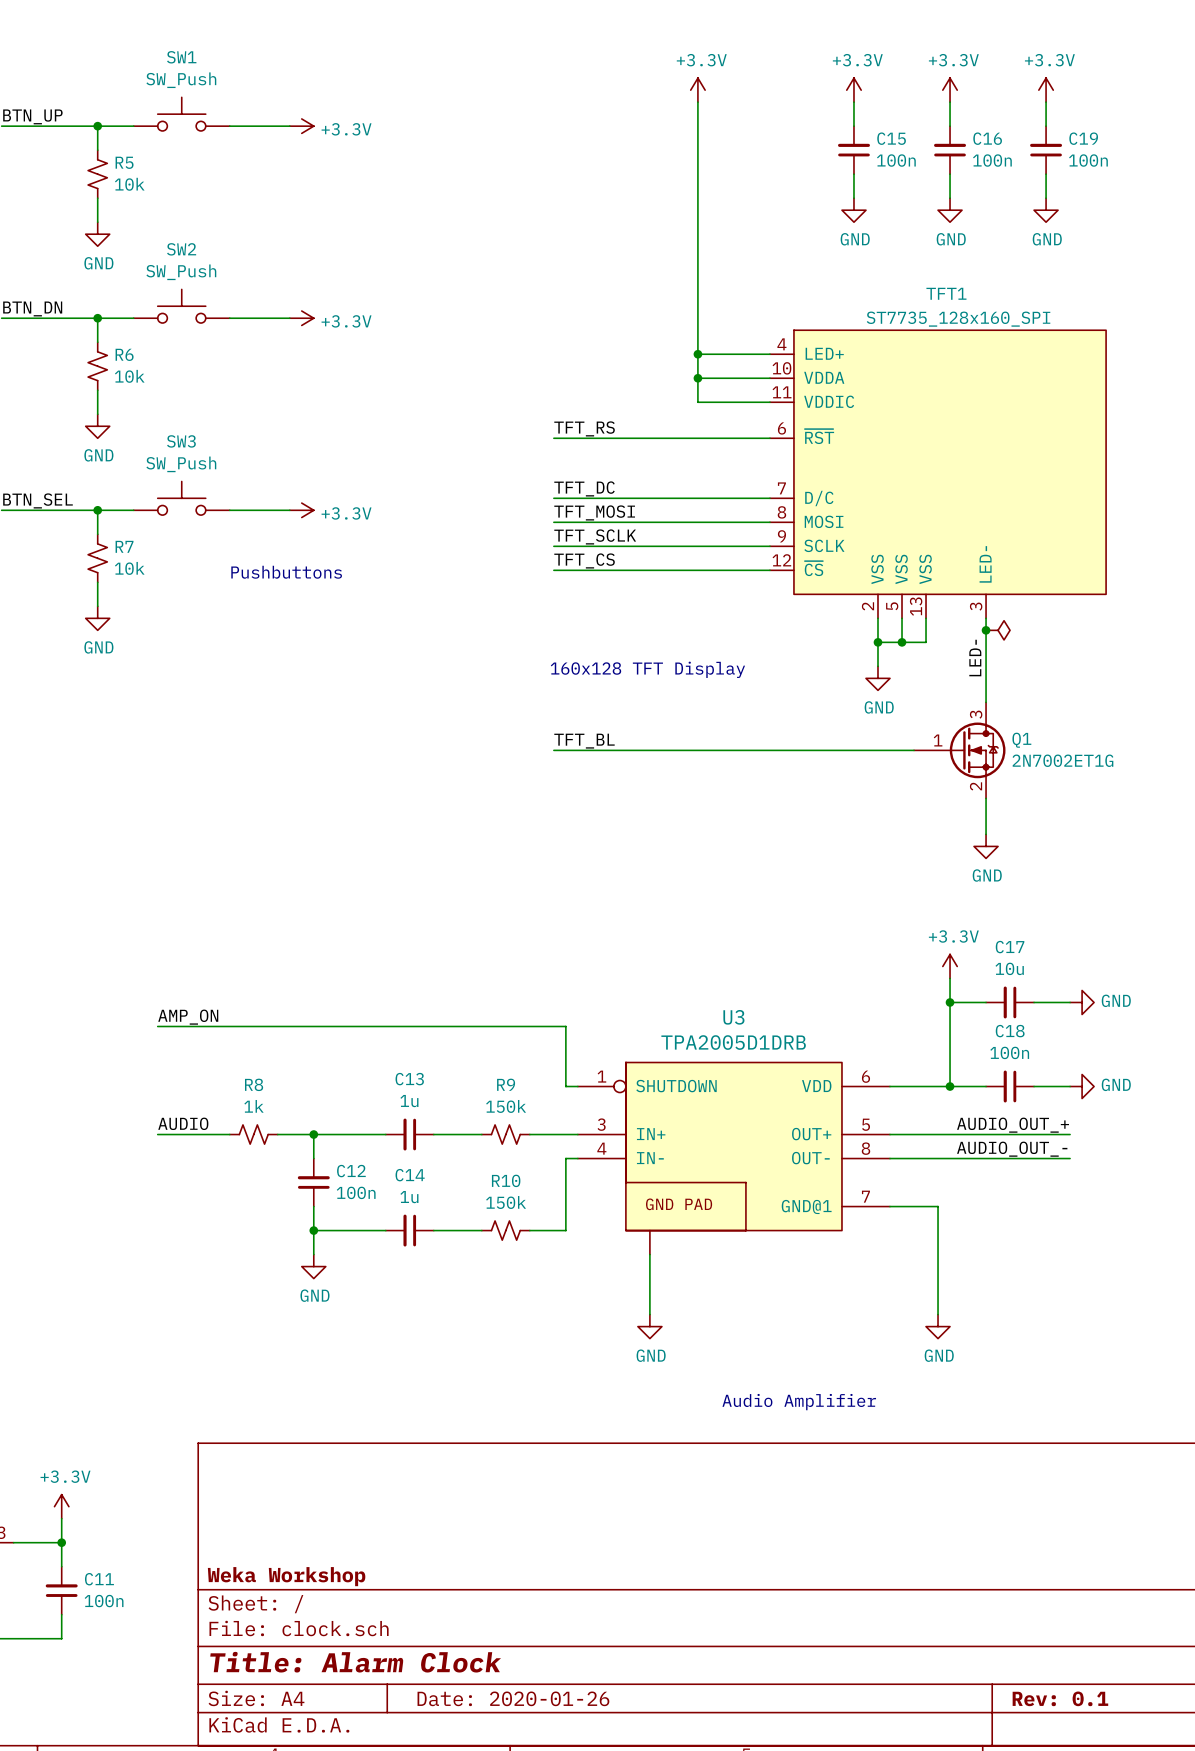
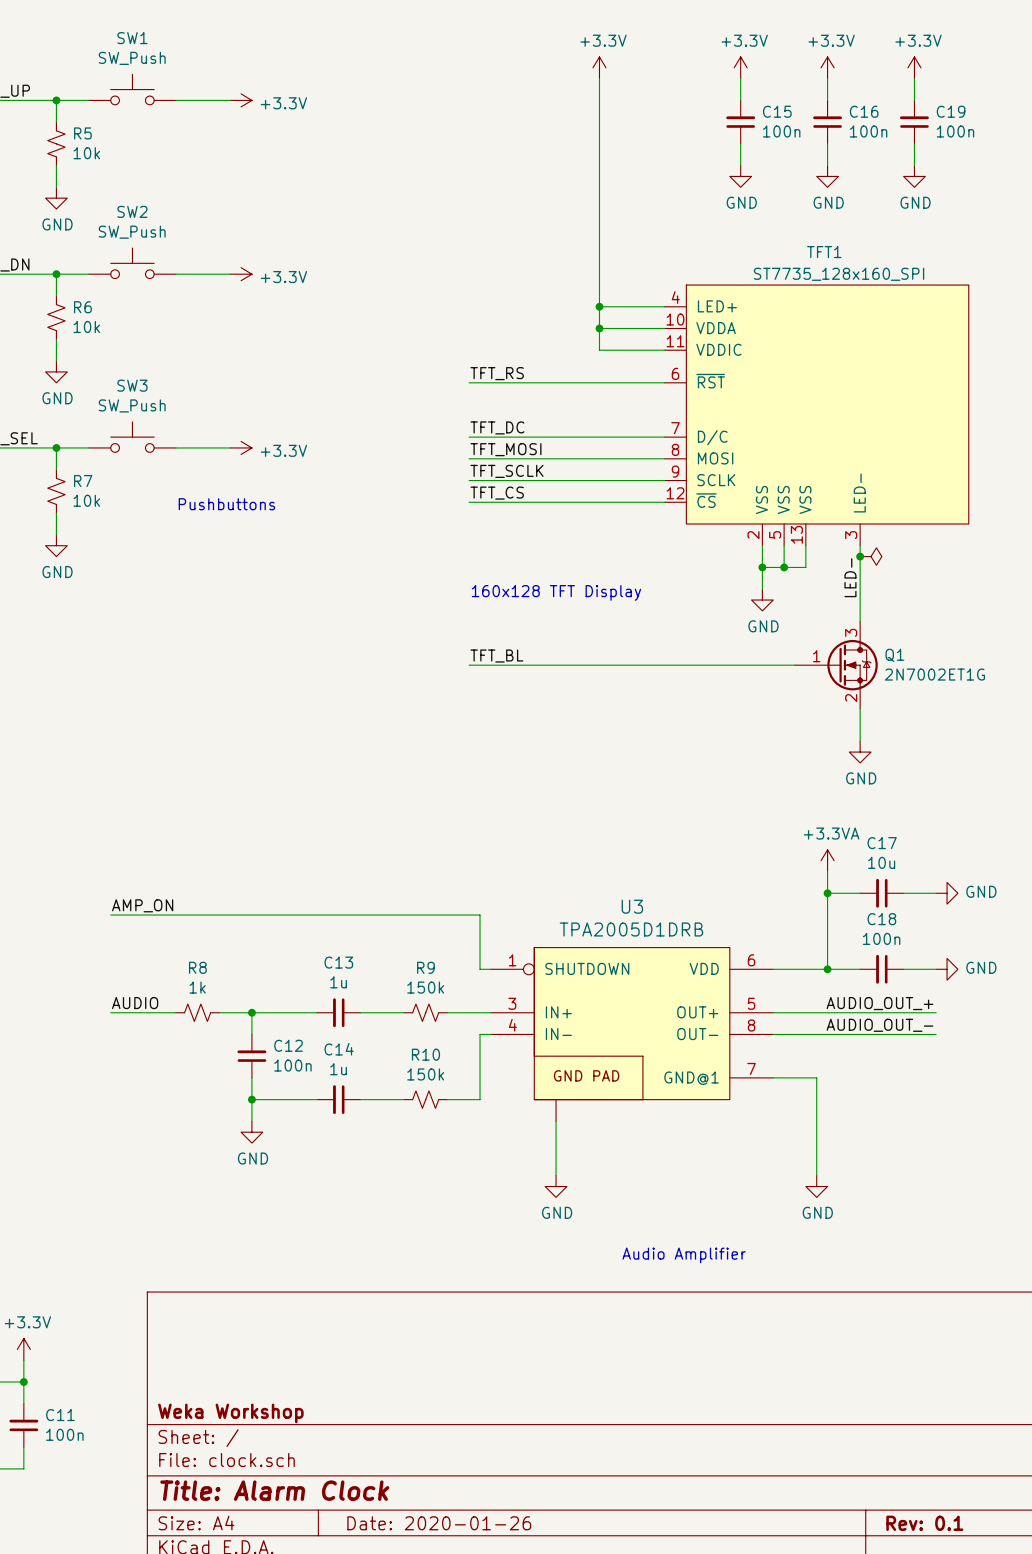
power symbol: +3.3V (950, 966) -> +3.3VA (827, 860)

